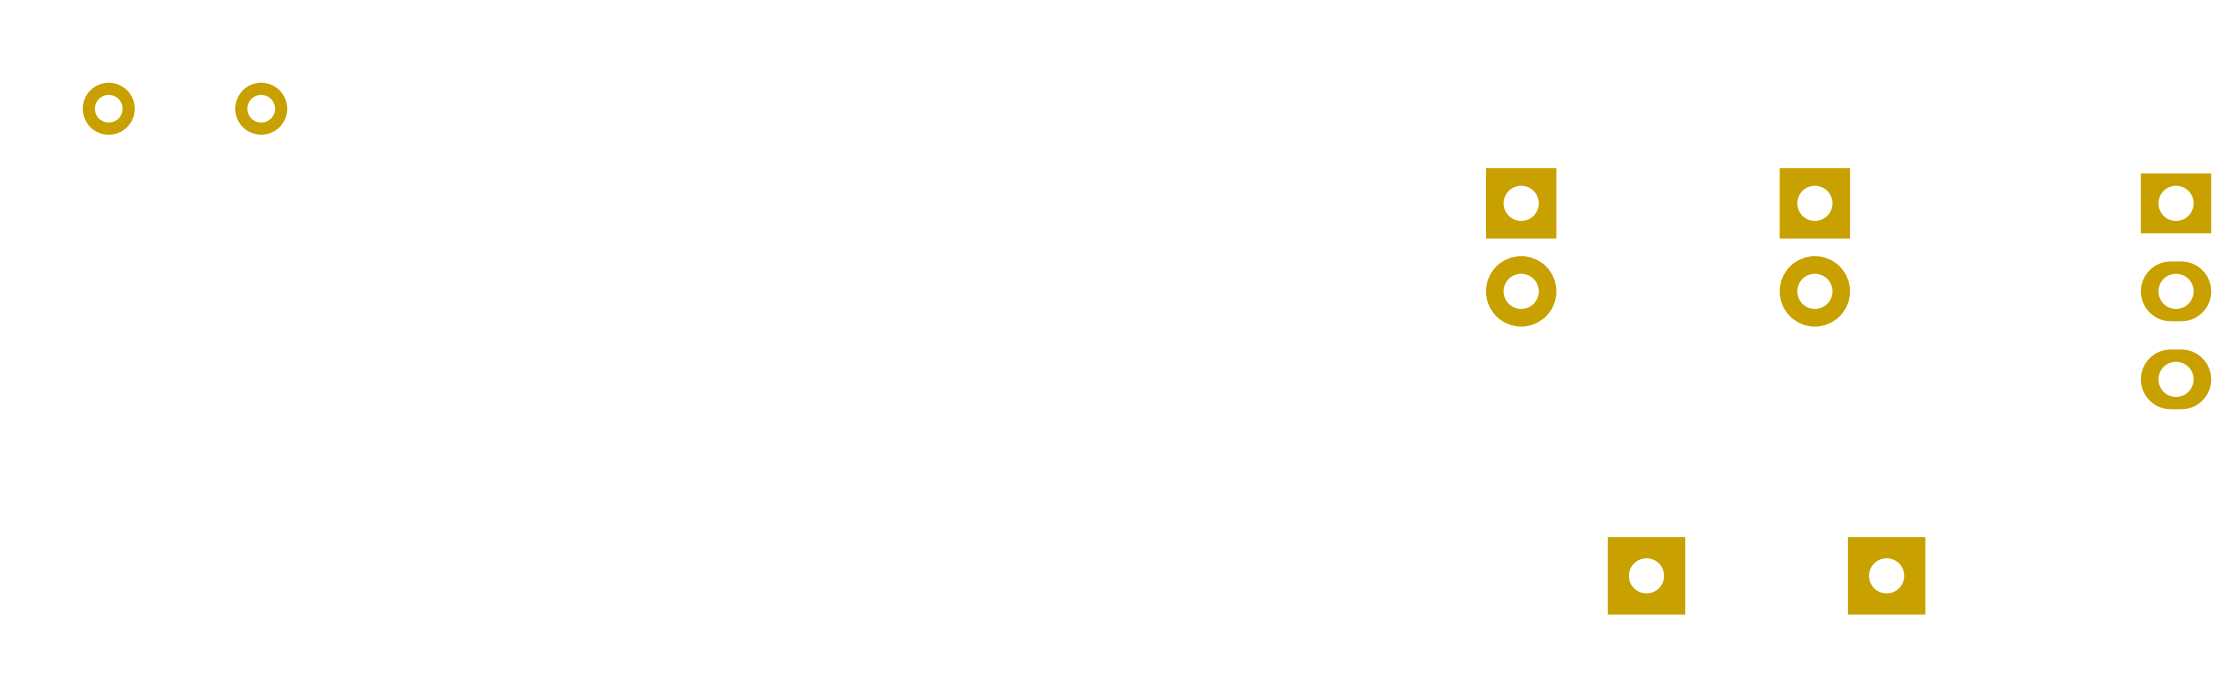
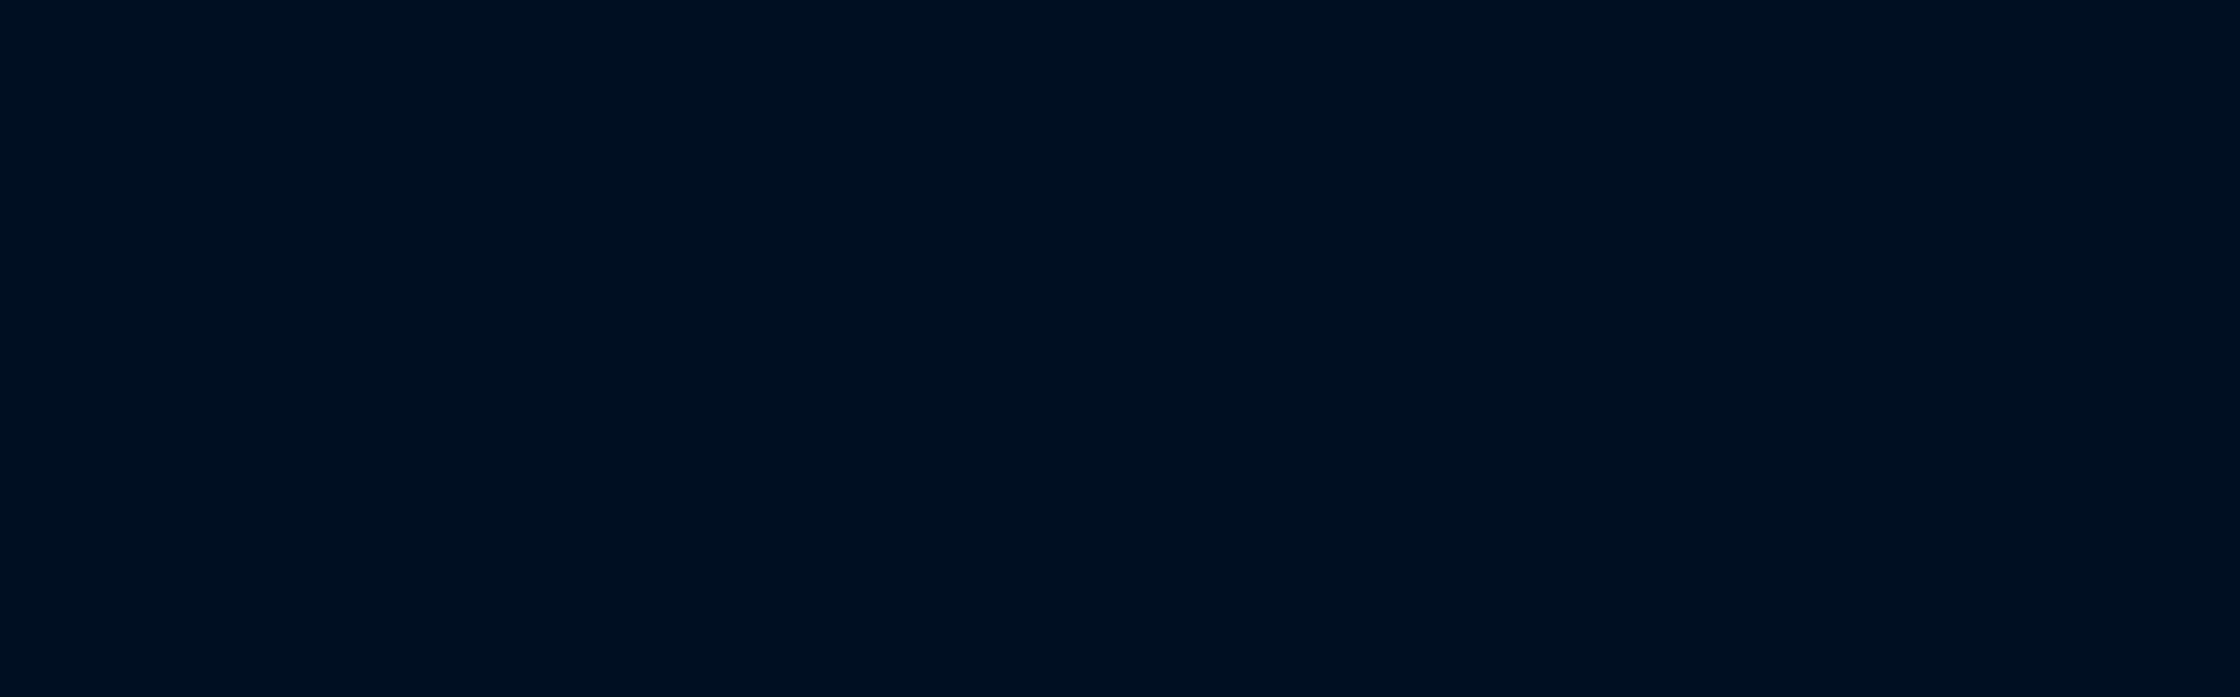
part: (108, 108) -> none
part: (261, 108) -> none
part: (1521, 247) -> none
part: (1814, 247) -> none
part: (2176, 291) -> none
part: (1646, 575) -> none
part: (1886, 575) -> none

